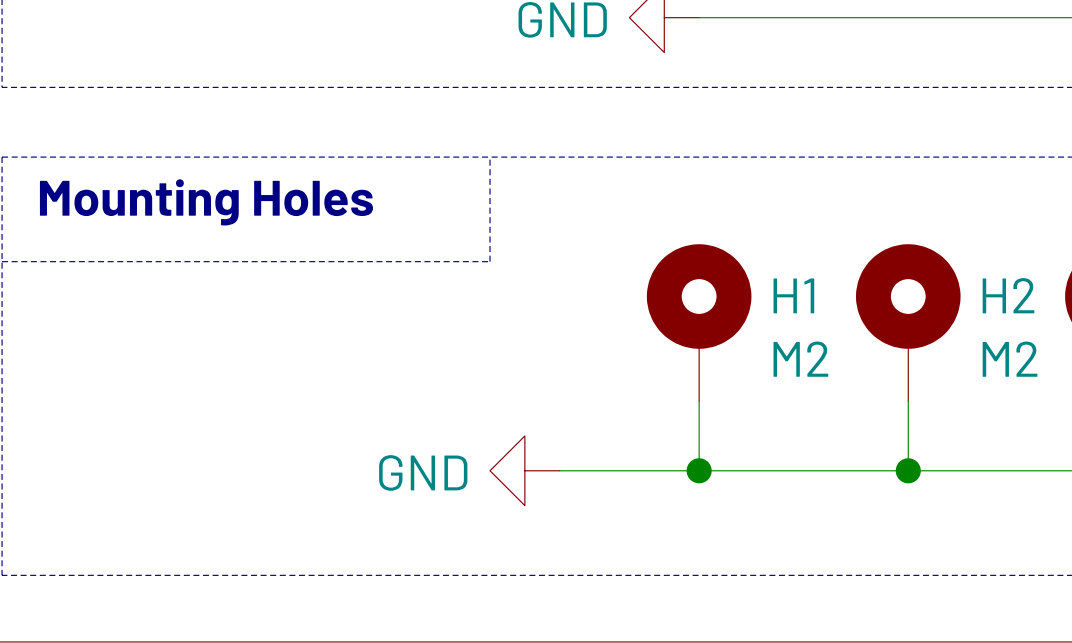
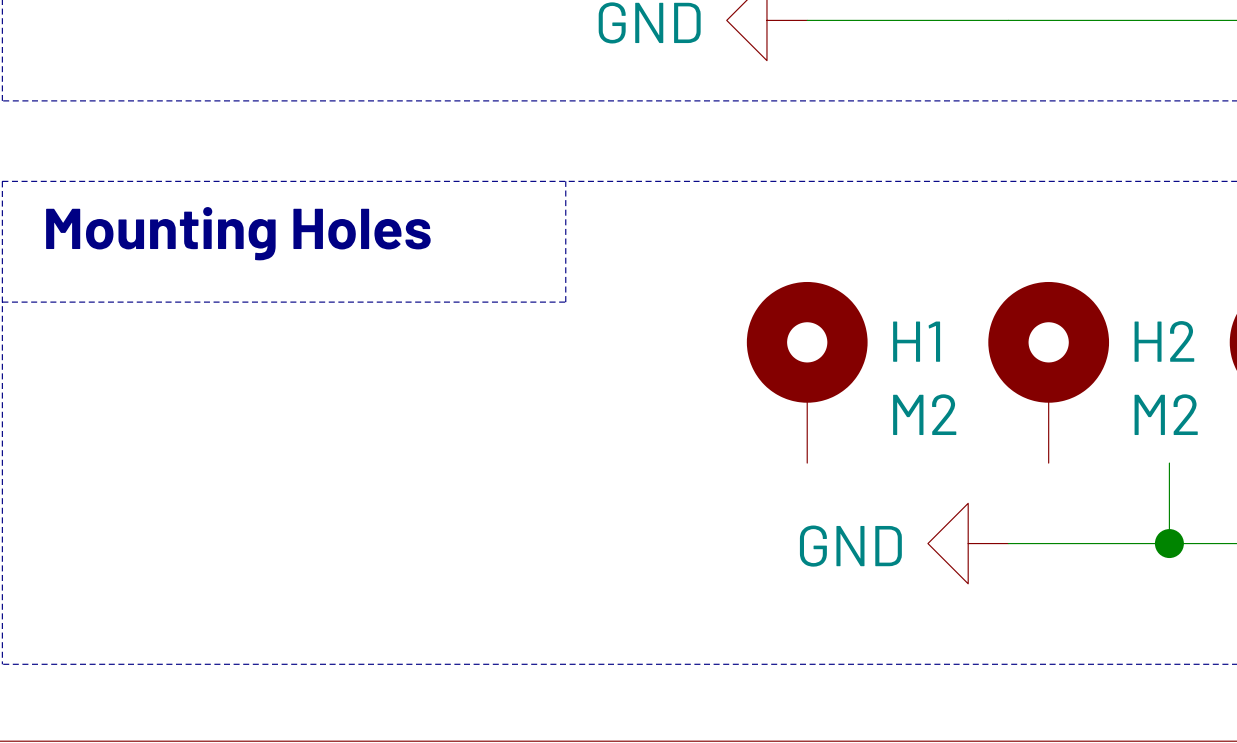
wire: (699, 401) (699, 470) -> none
wire: (908, 401) (908, 470) -> (1169, 463) (1169, 543)
power symbol position: GND (524, 470) -> GND (968, 543)
wire: (559, 470) (873, 470) -> none
junction: (699, 470) -> none
junction: (908, 470) -> none
junction: none -> (1169, 543)

